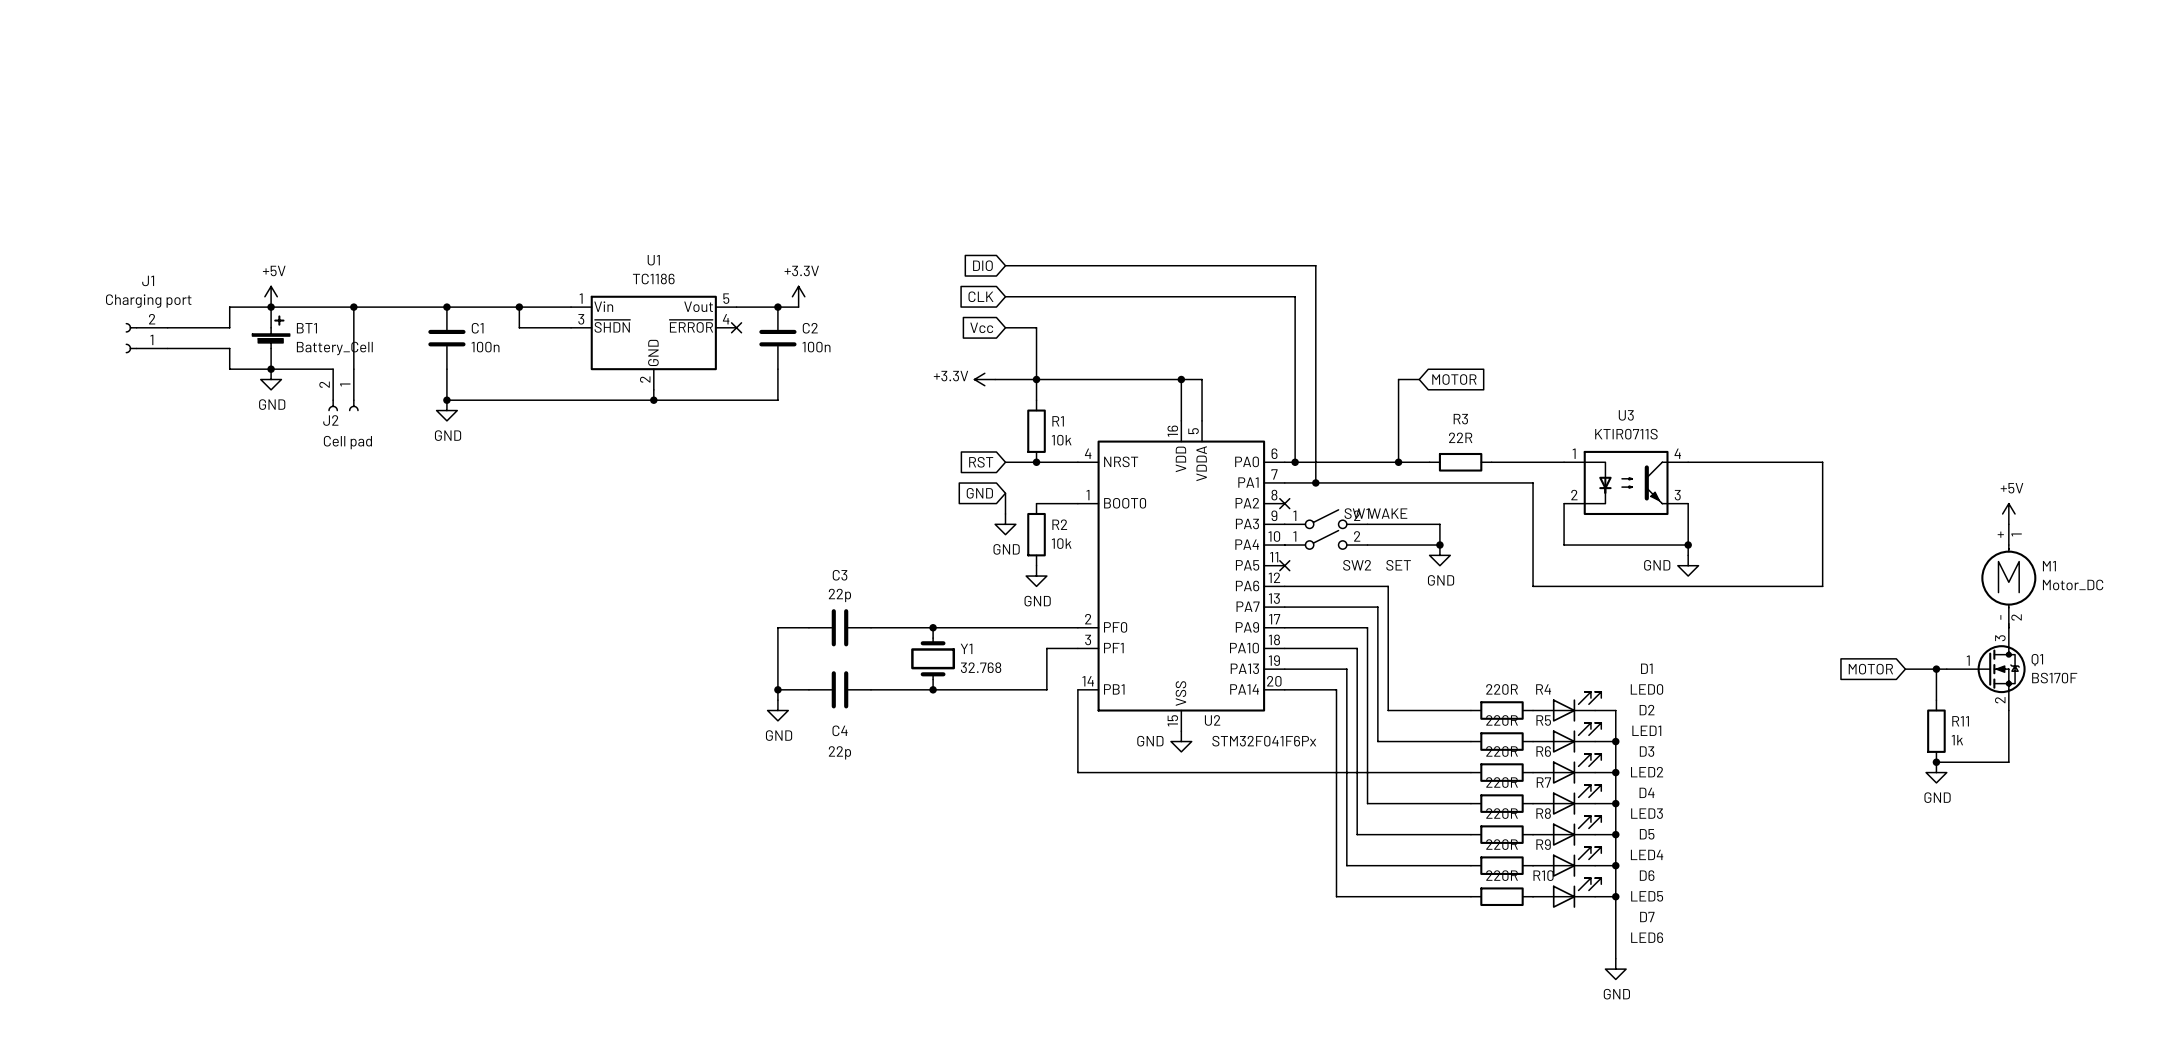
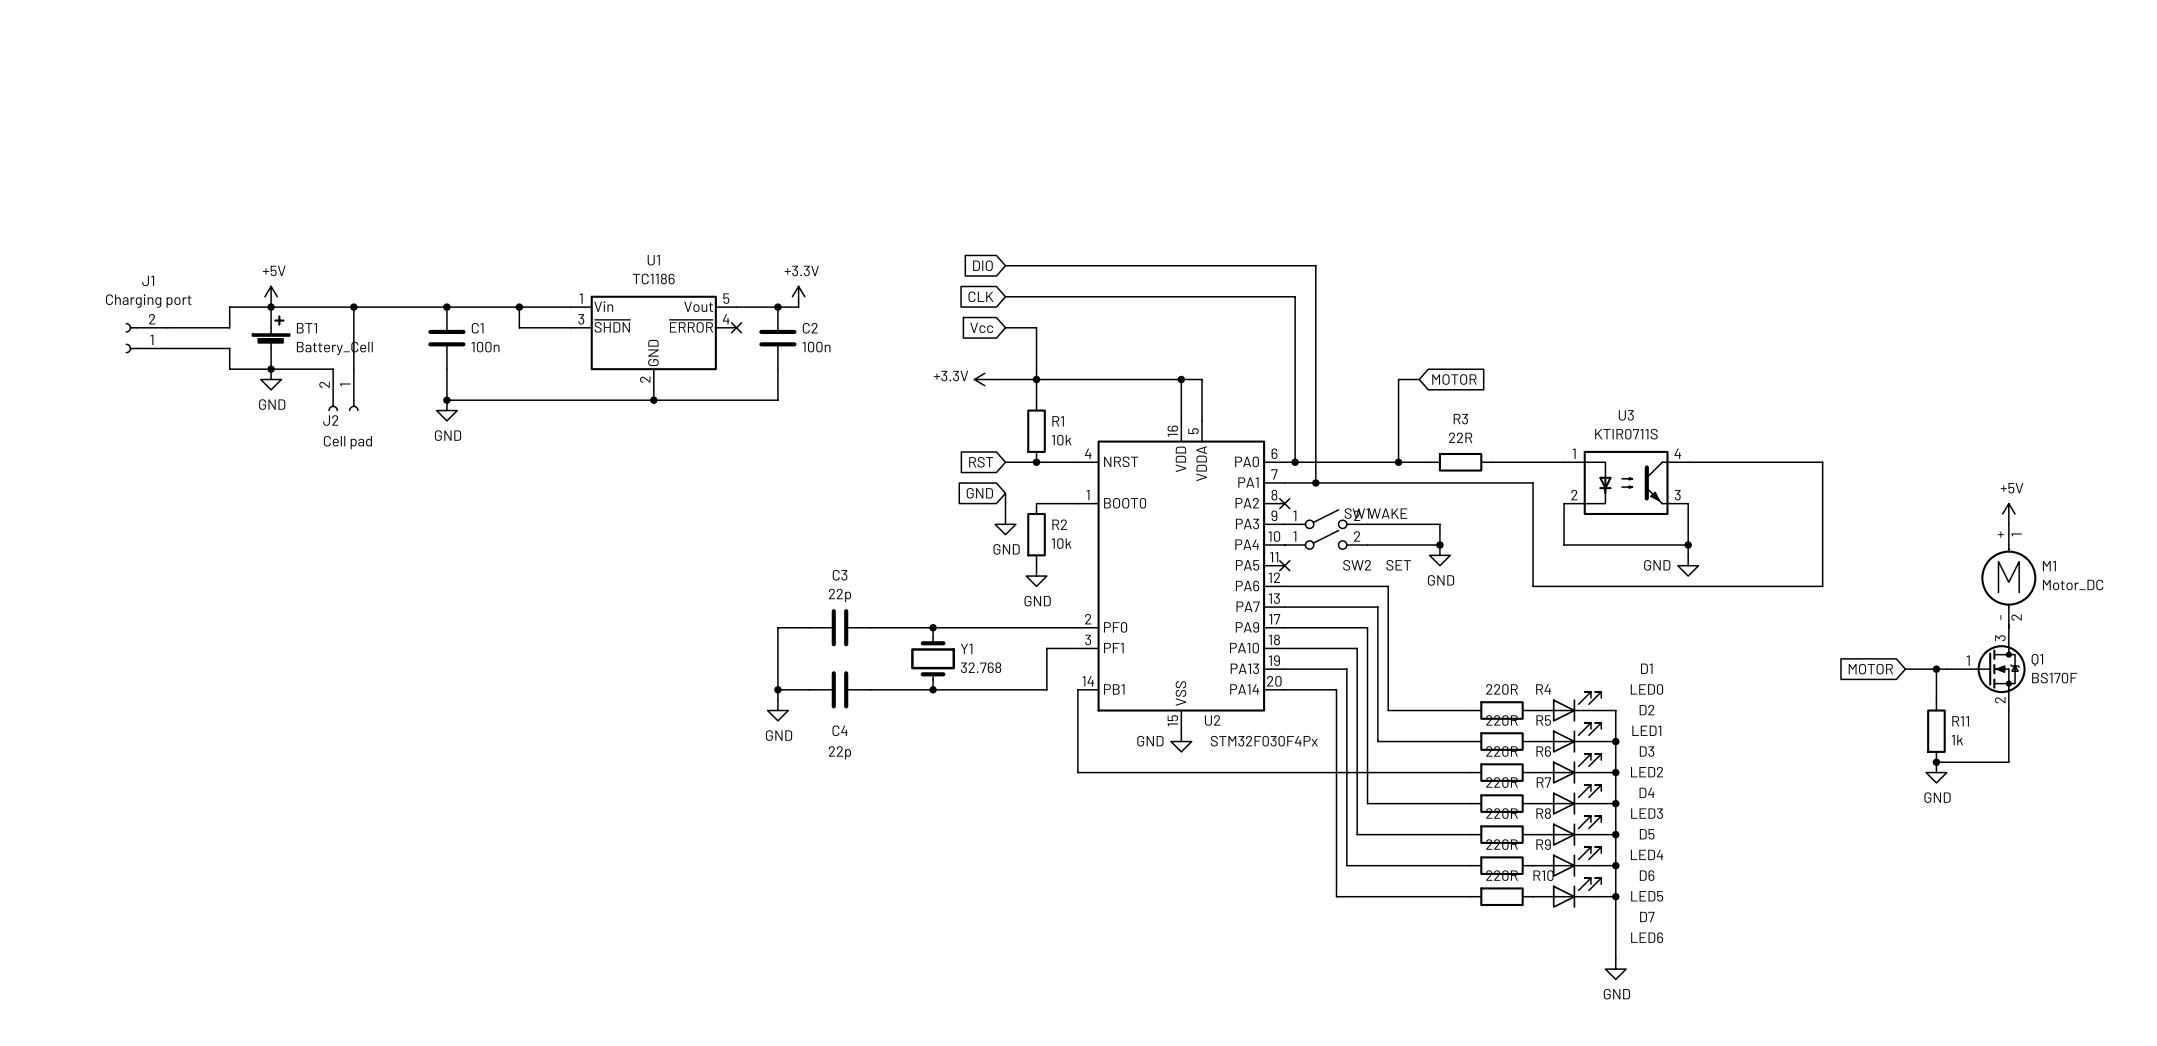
U2 value: STM32F041F6Px (1264, 741) -> STM32F030F4Px (1264, 741)

